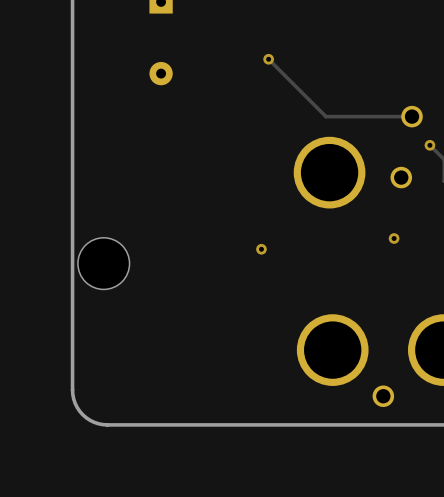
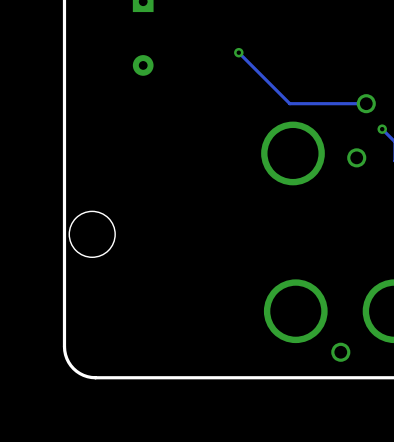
via: (394, 238) -> none
via: (261, 249) -> none

